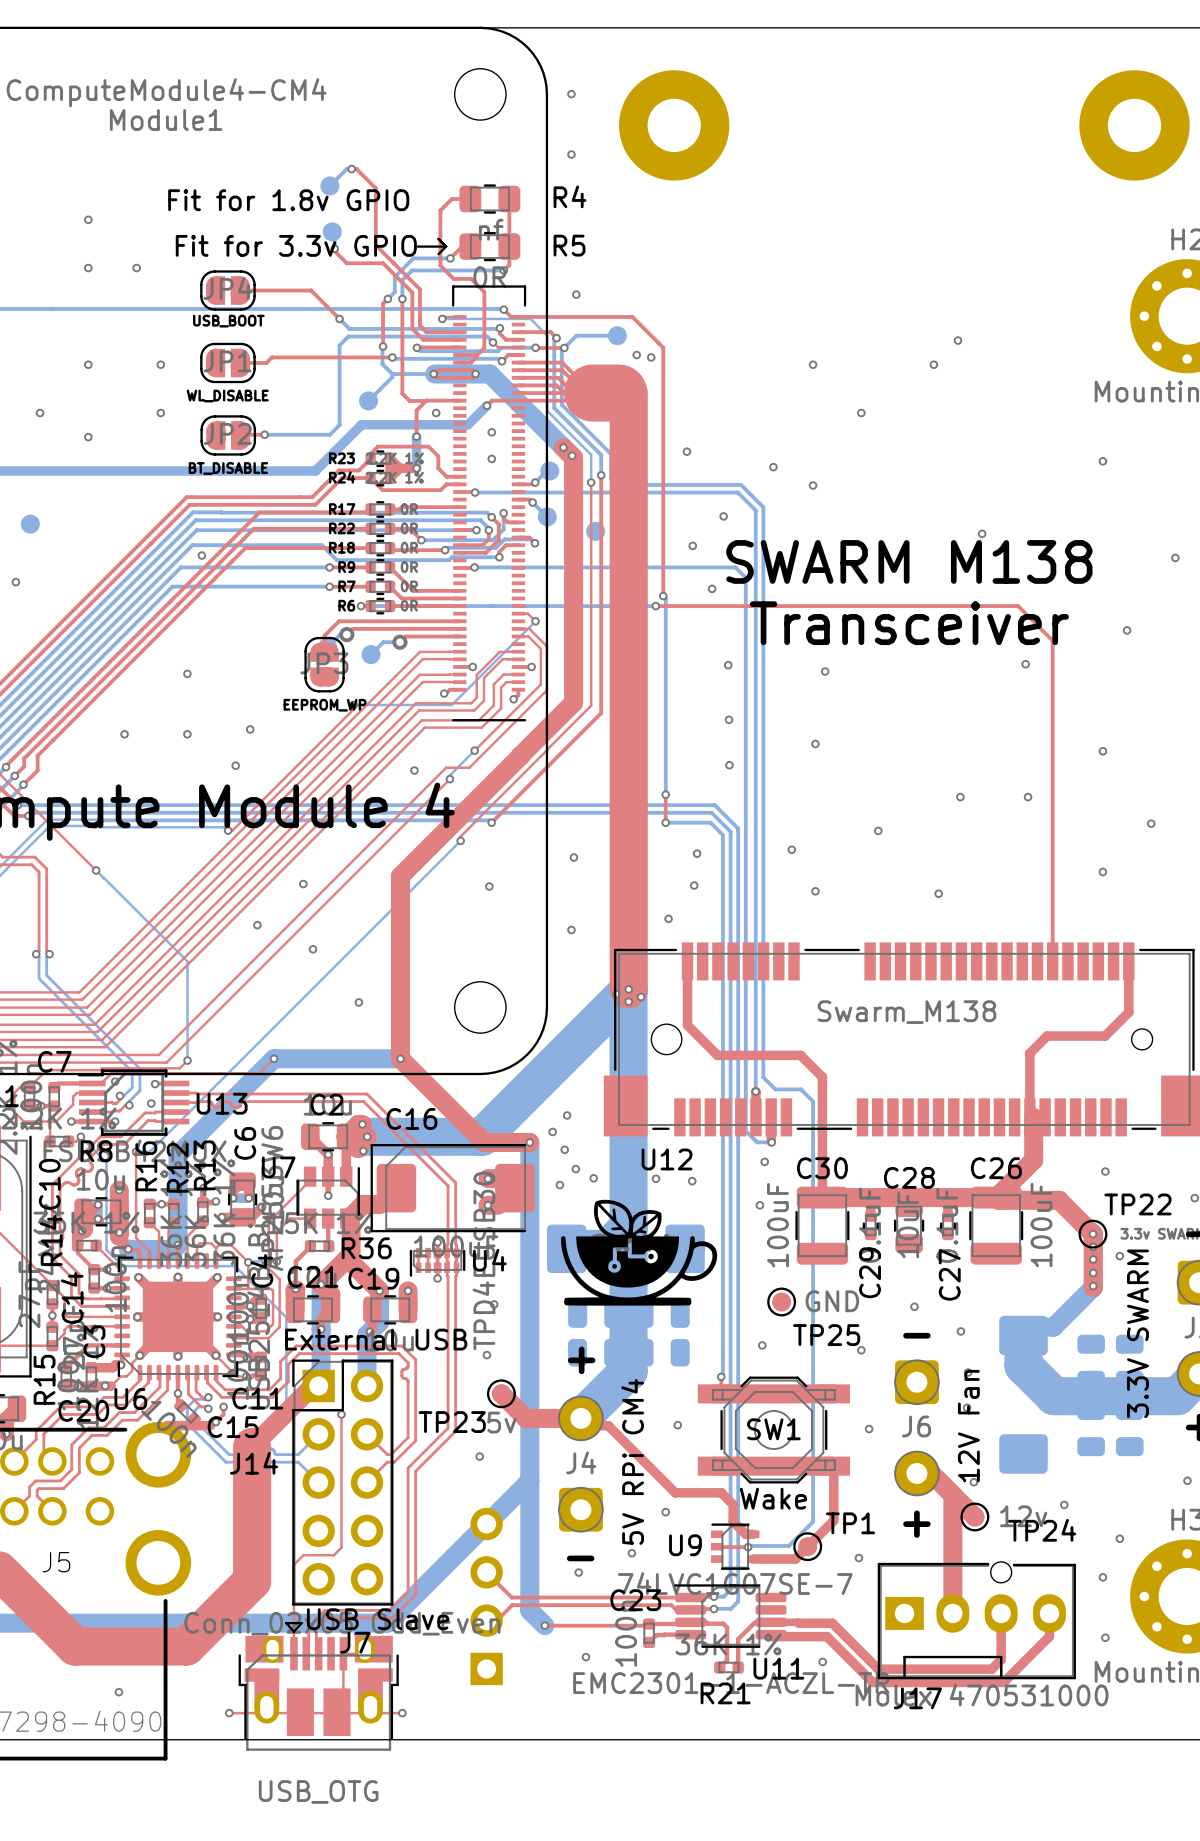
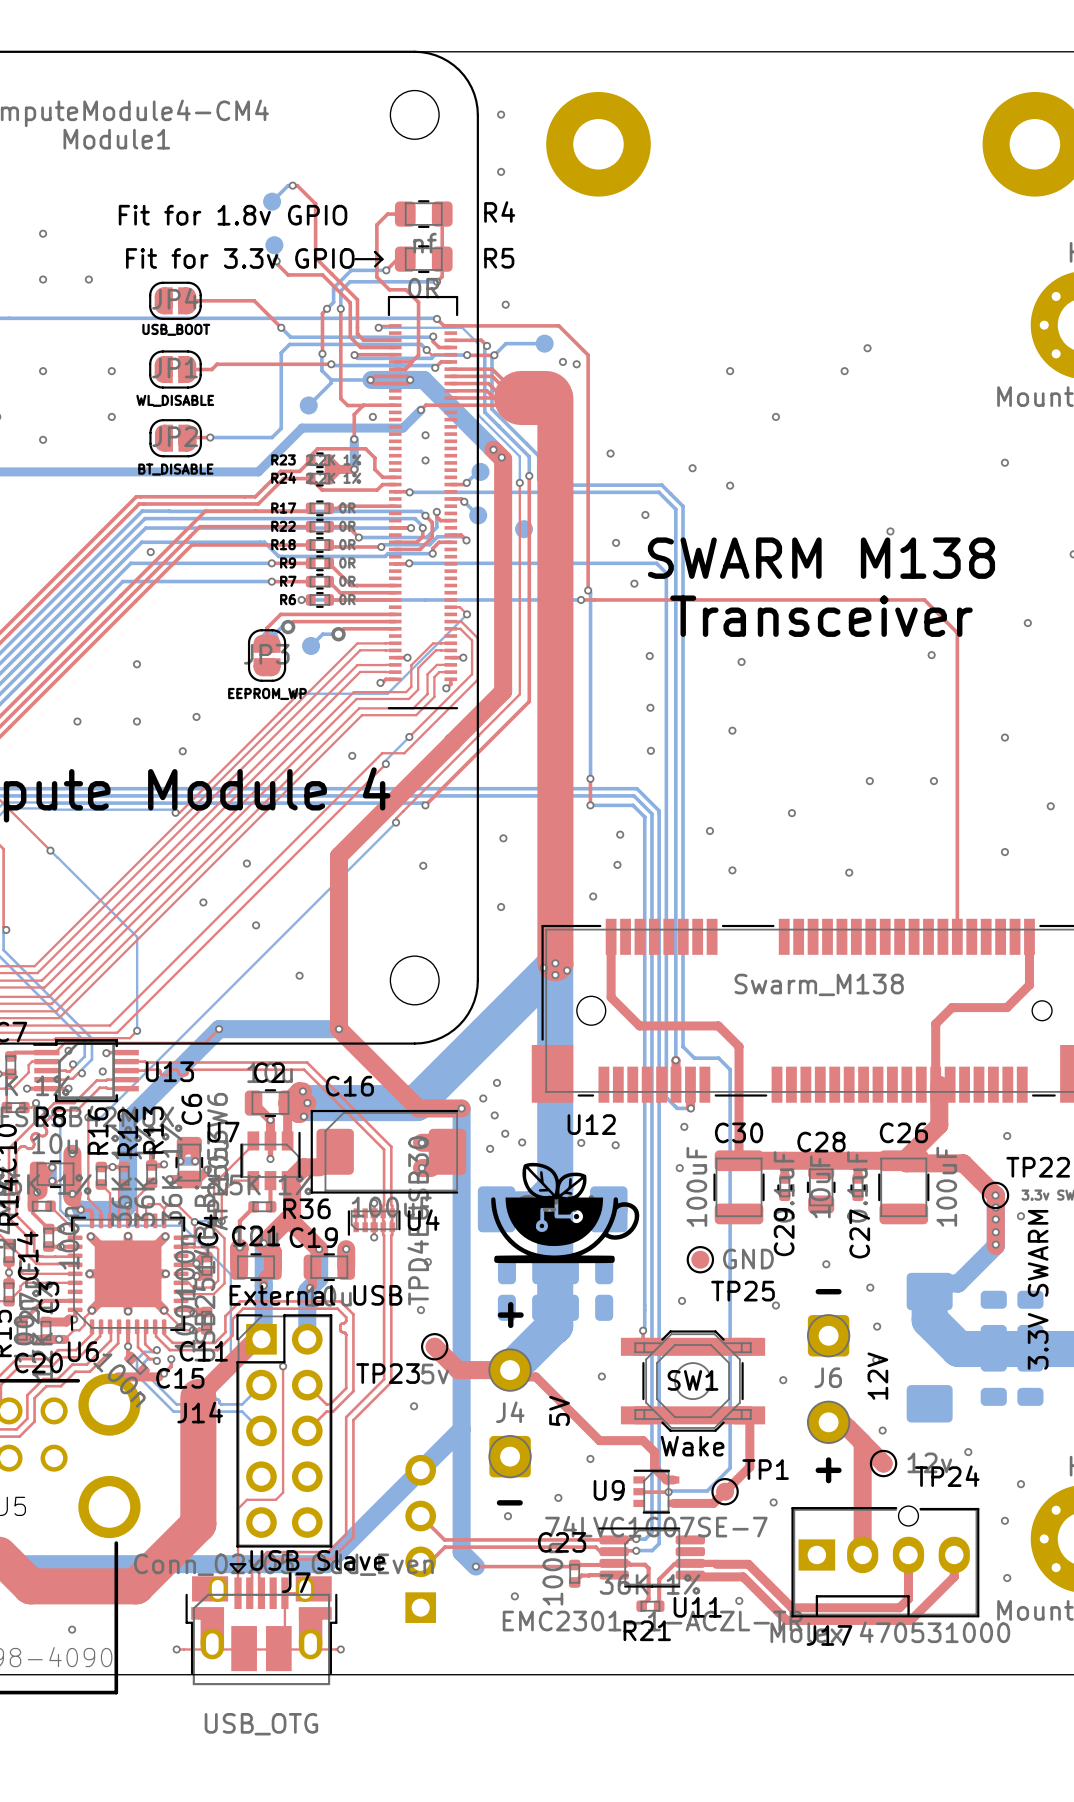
J6 value: 12V Fan (968, 1426) -> 12V (877, 1376)
J4 value: 5V RPi CM4 (632, 1461) -> 5V (559, 1410)

